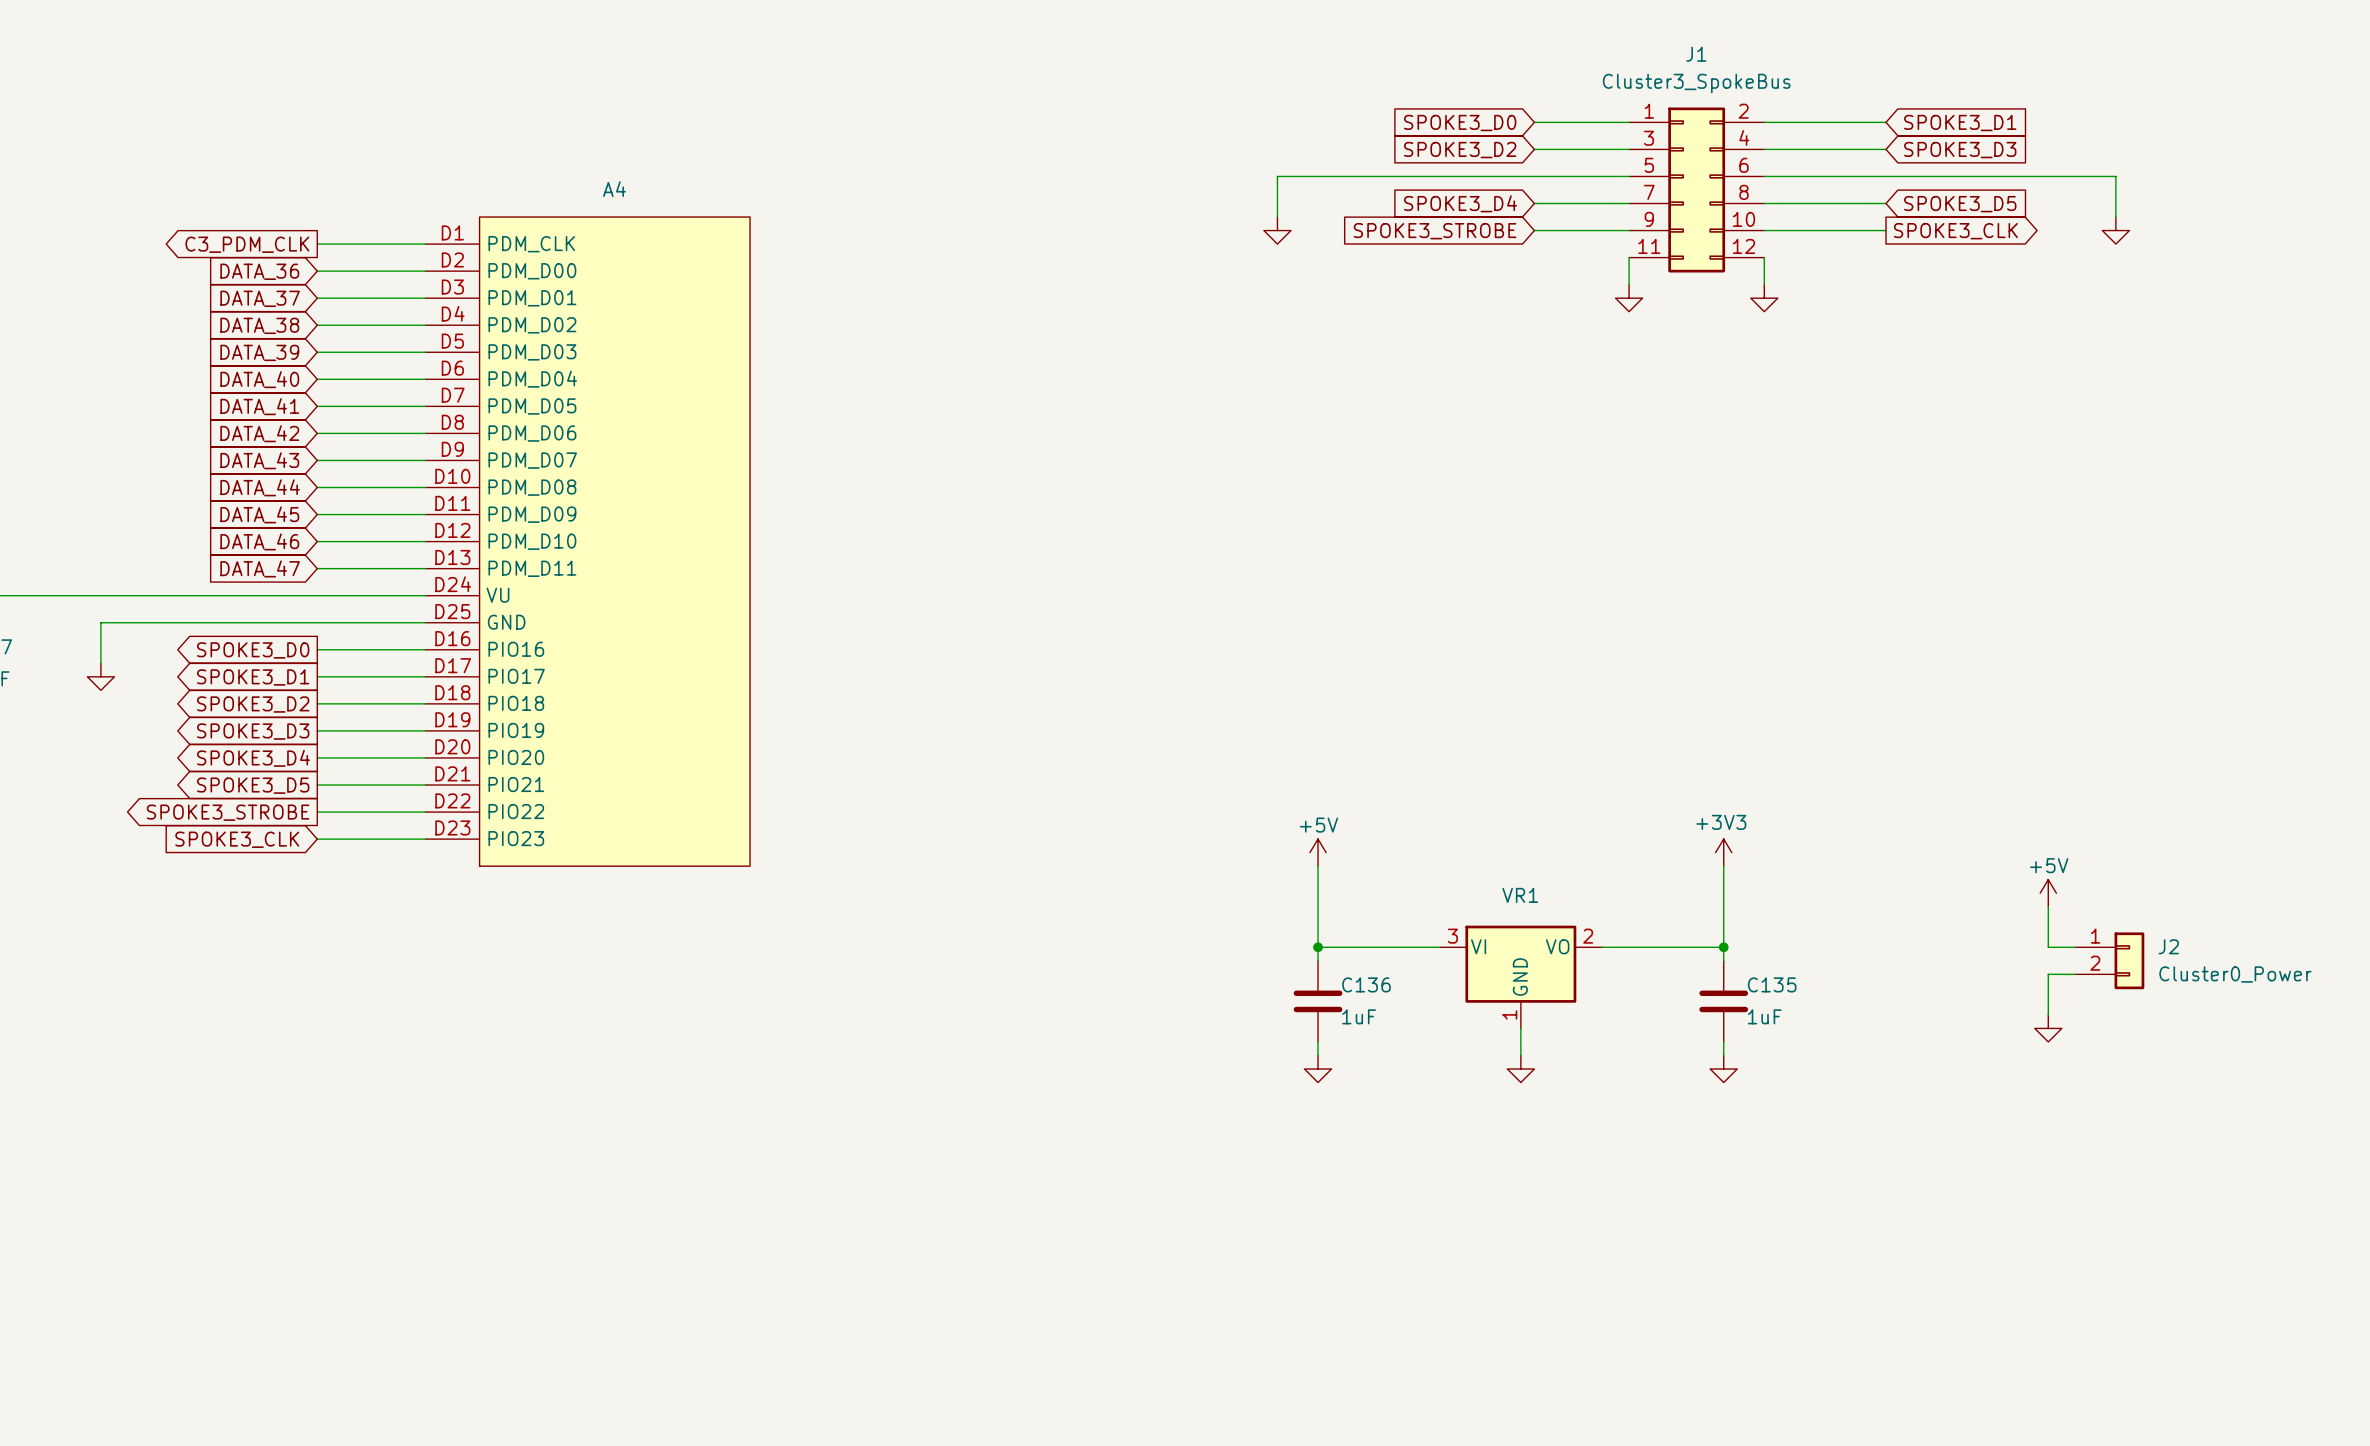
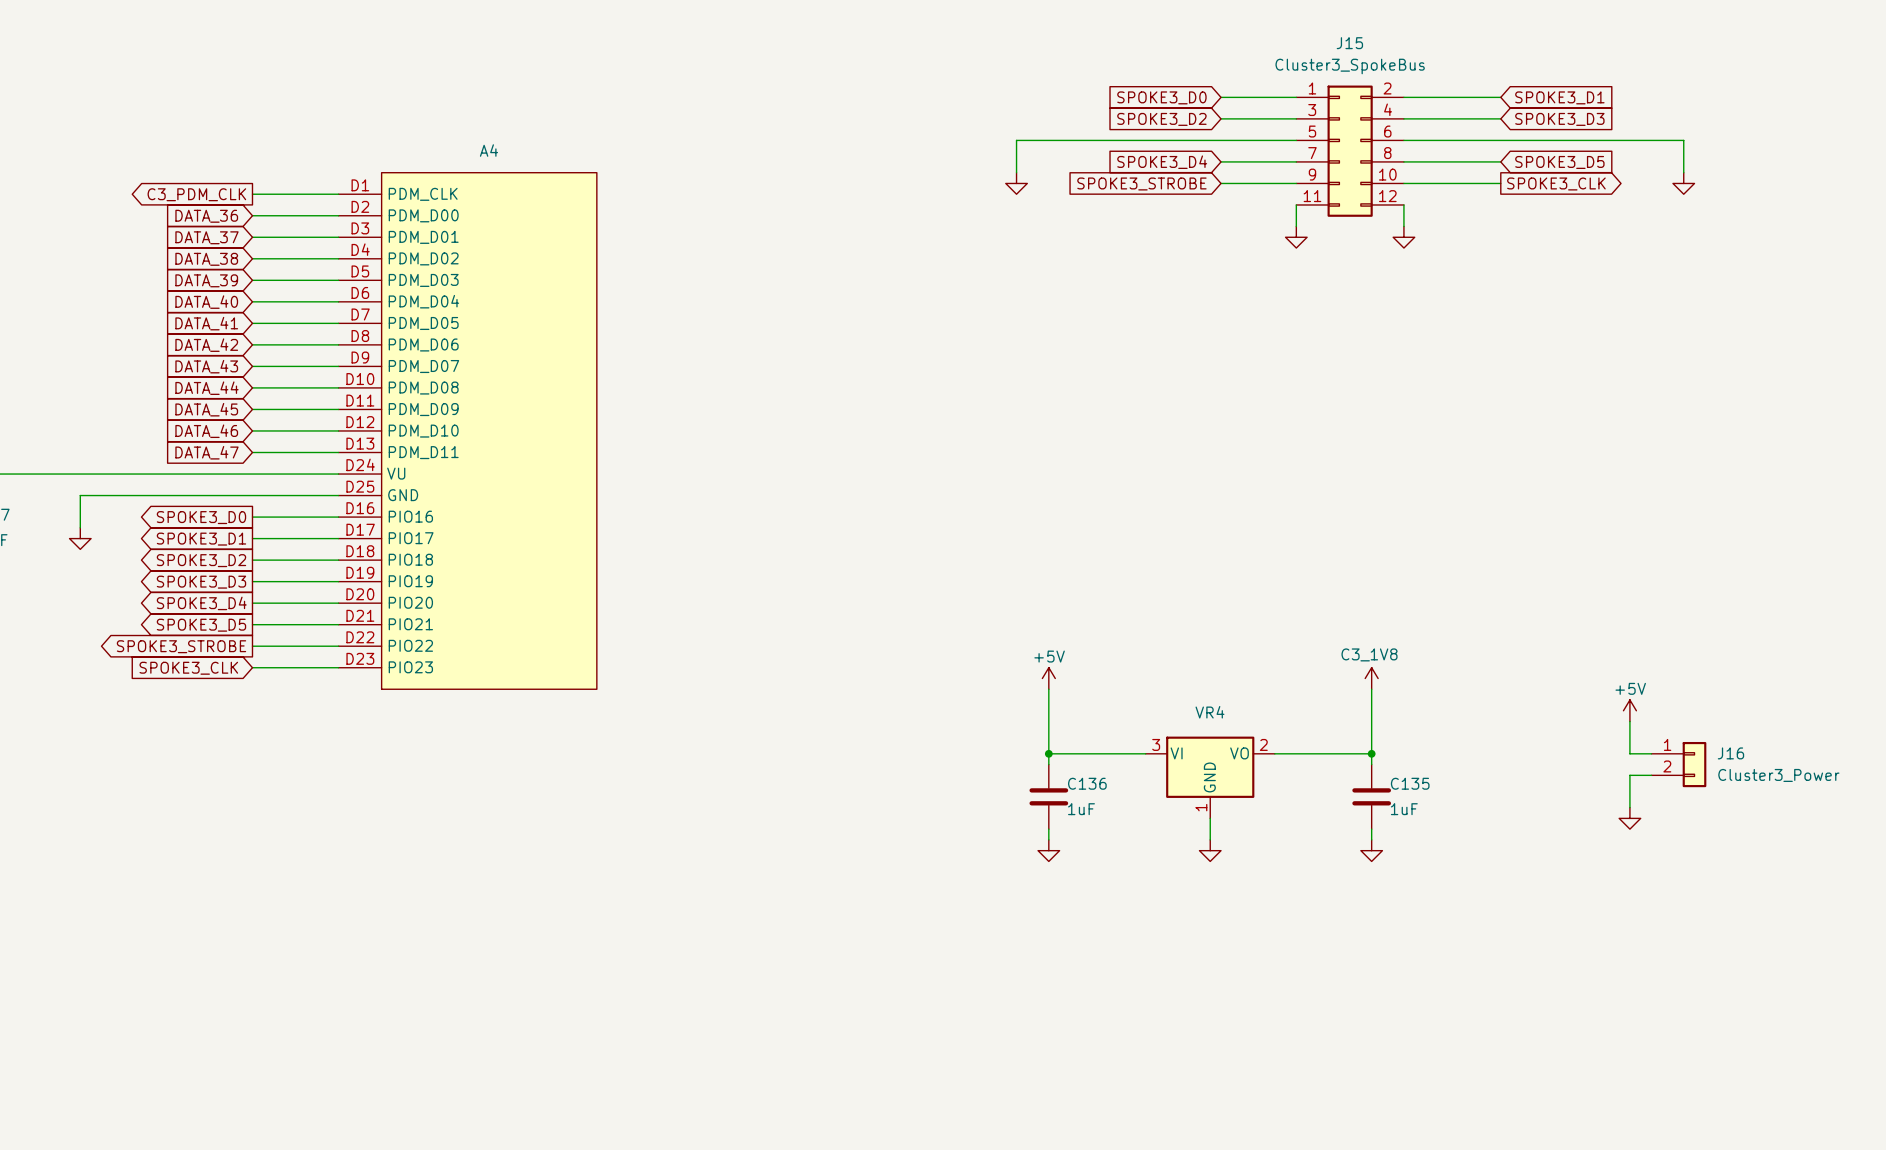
J1 name: J1 (1696, 54) -> J15 (1349, 43)
power symbol: +3V3 (1723, 852) -> C3_1V8 (1371, 678)
VR1 name: VR1 (1520, 895) -> VR4 (1209, 712)
J2 name: J2 (2168, 946) -> J16 (1730, 753)
J2 value: Cluster0_Power (2235, 974) -> Cluster3_Power (1778, 775)

